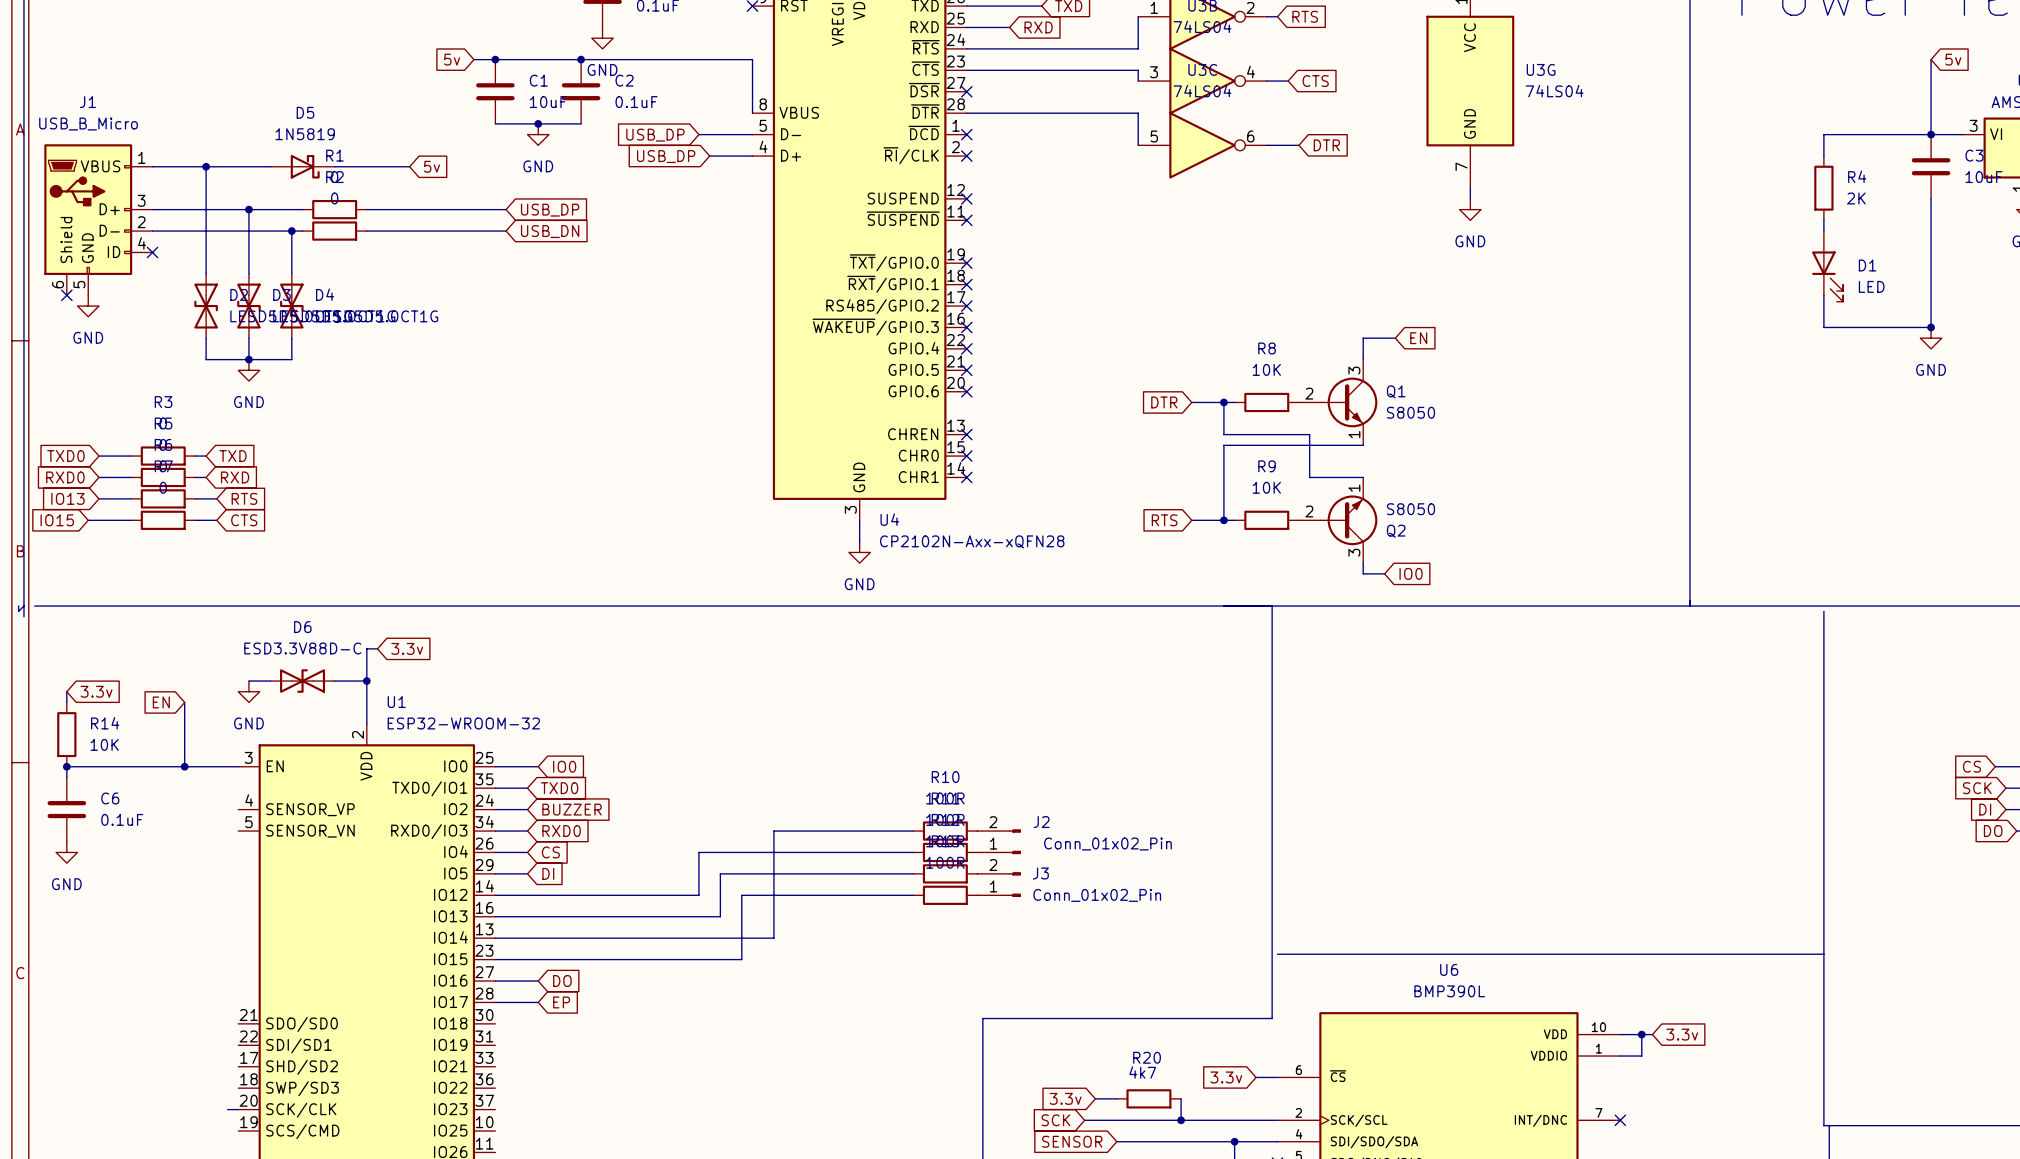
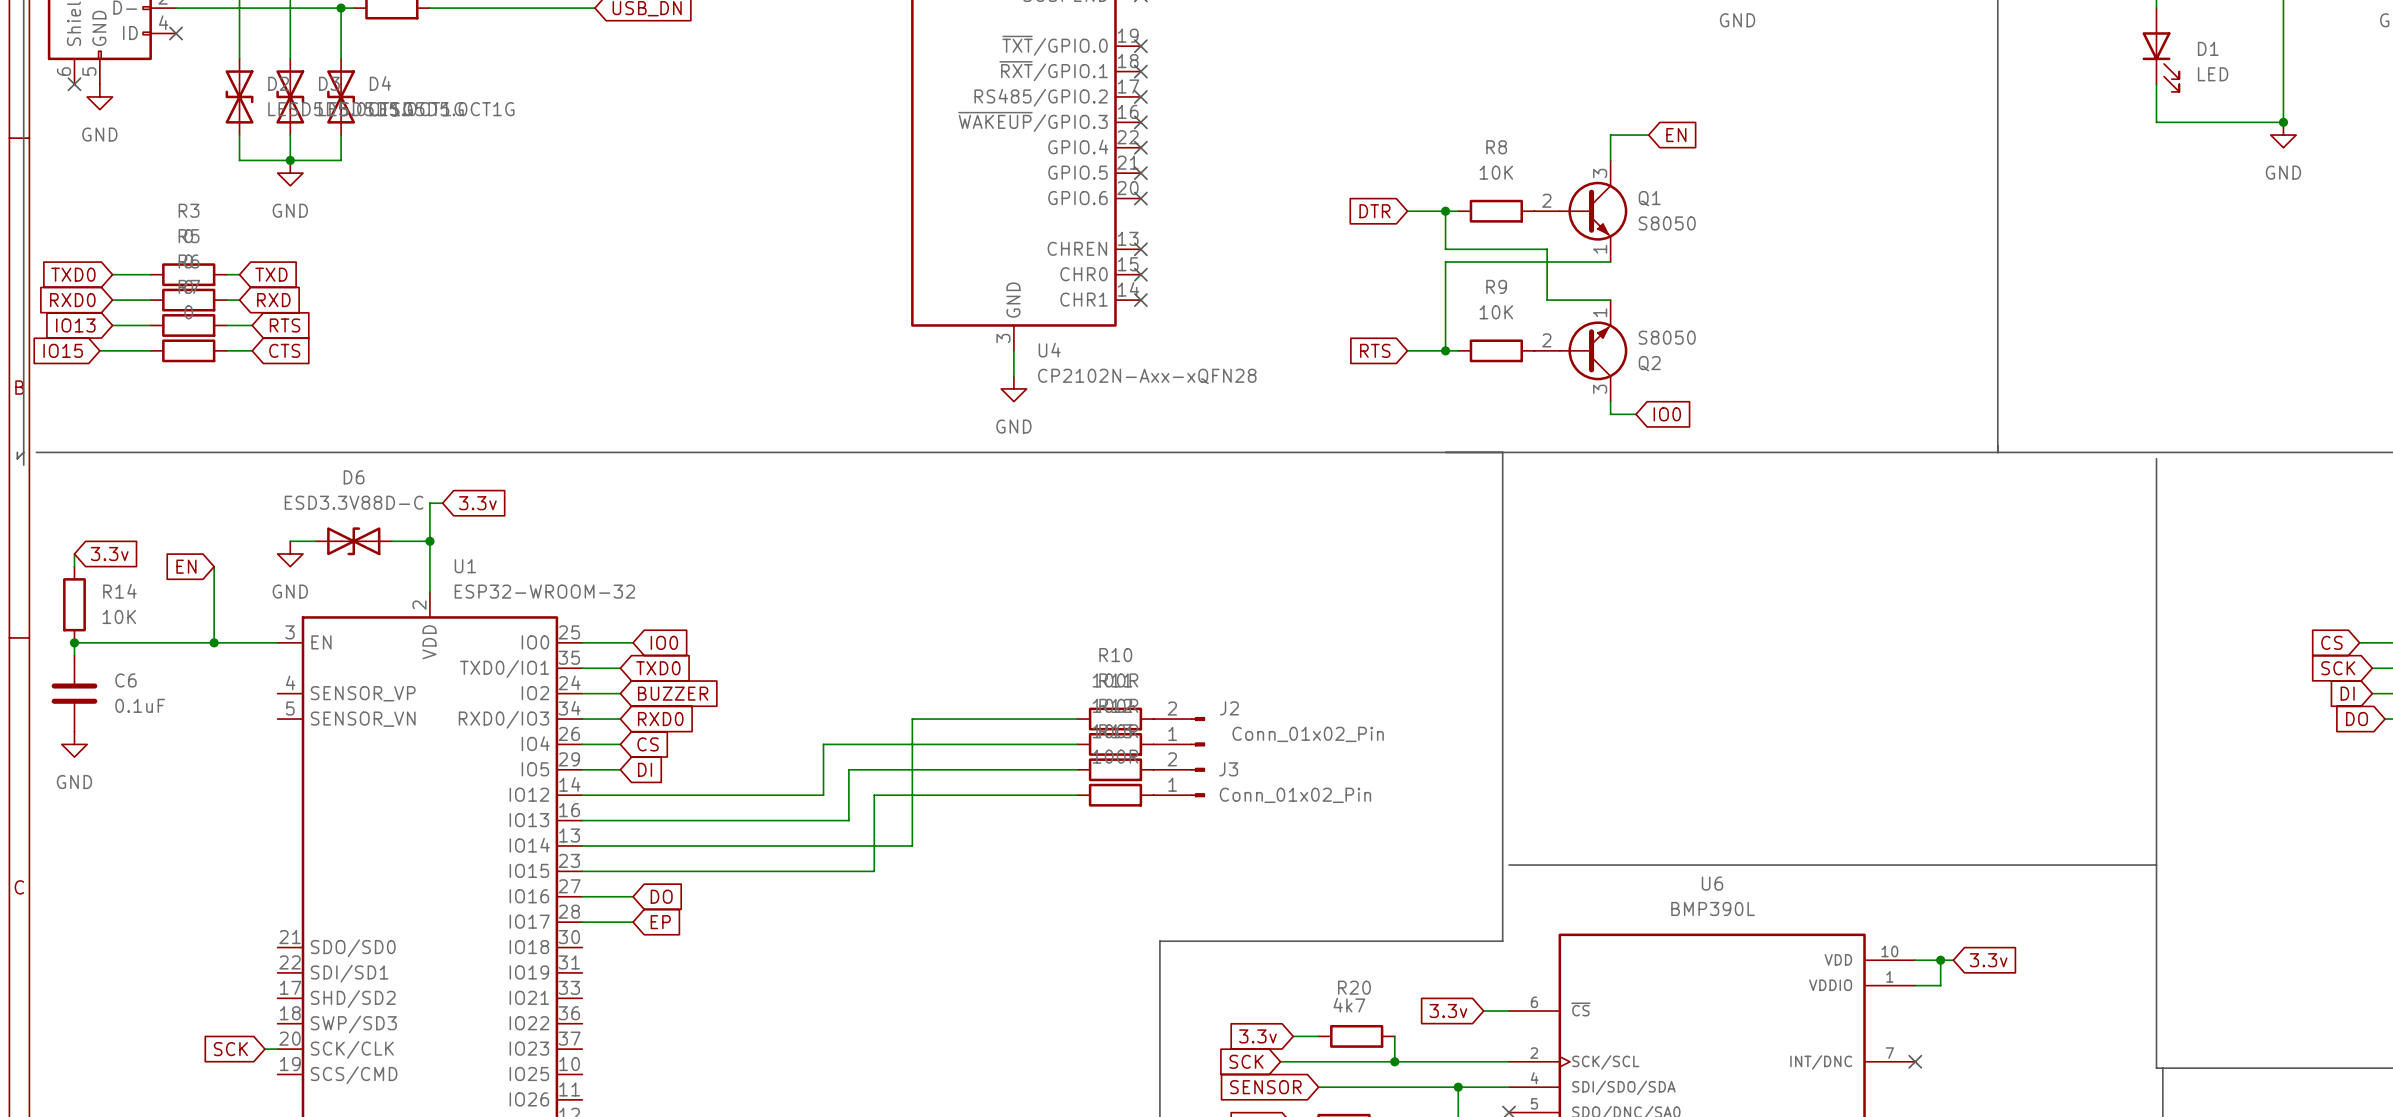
global label: none -> SCK (230, 1049)

